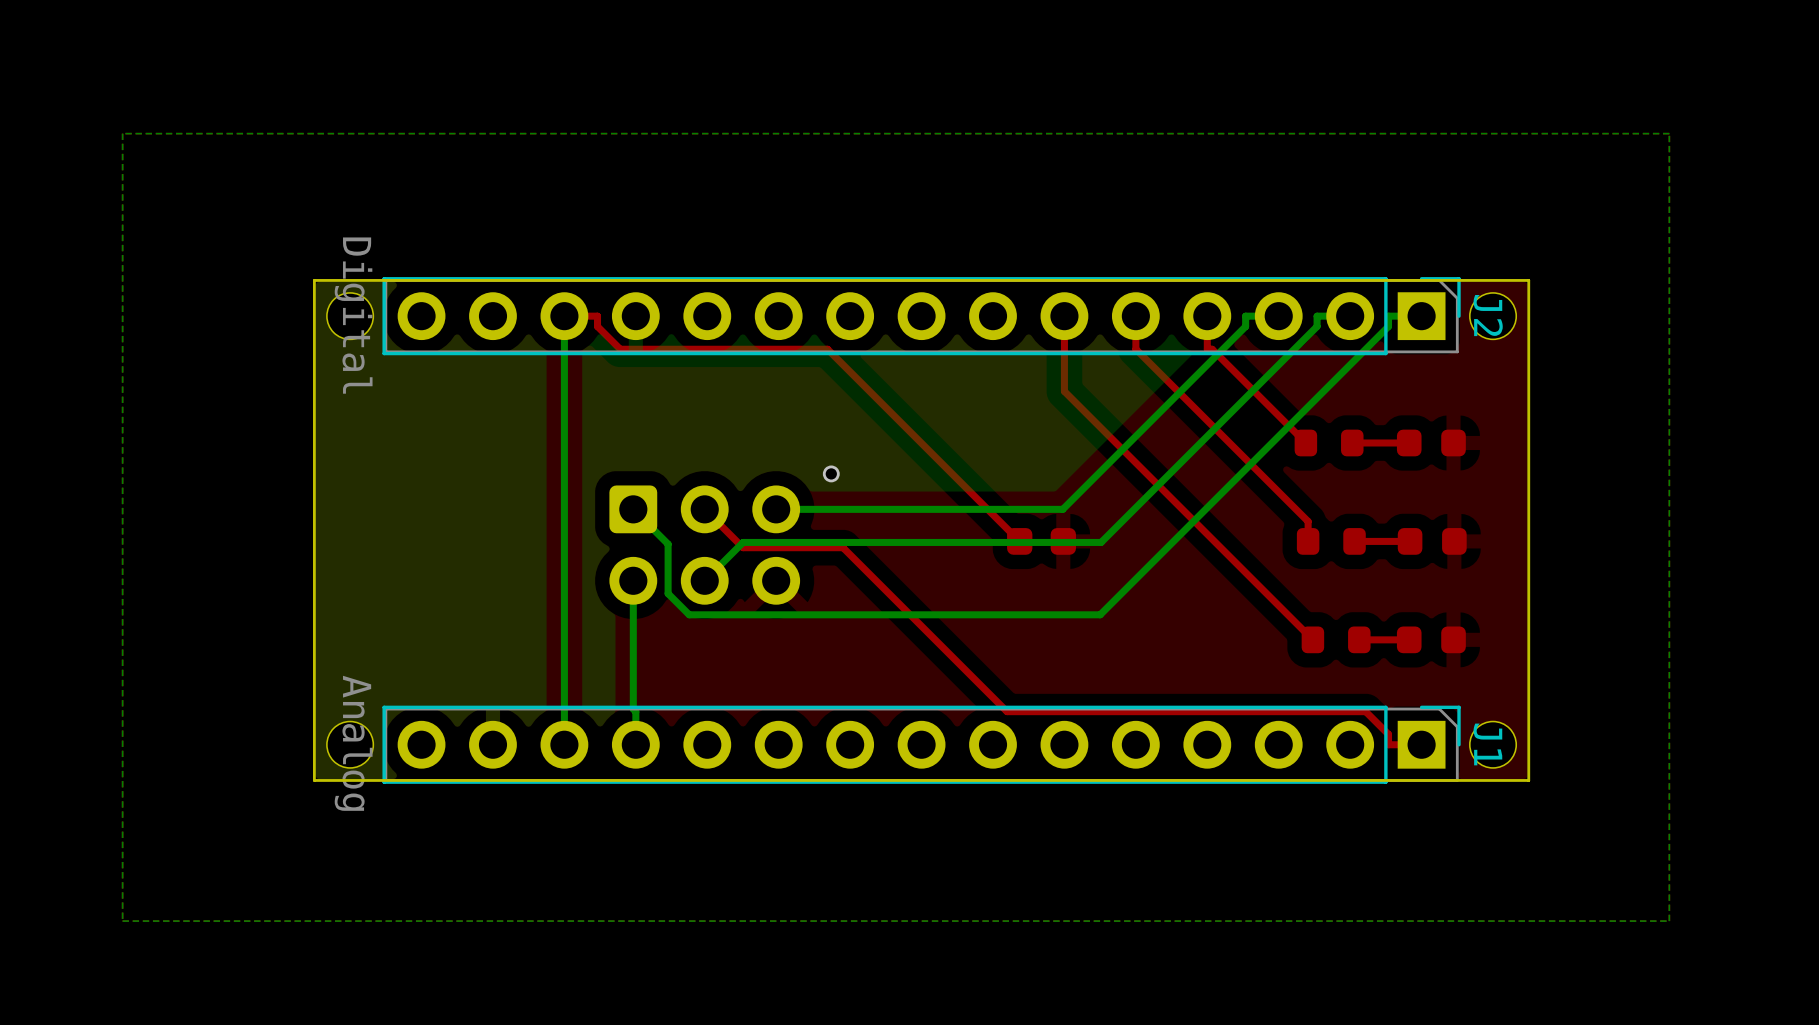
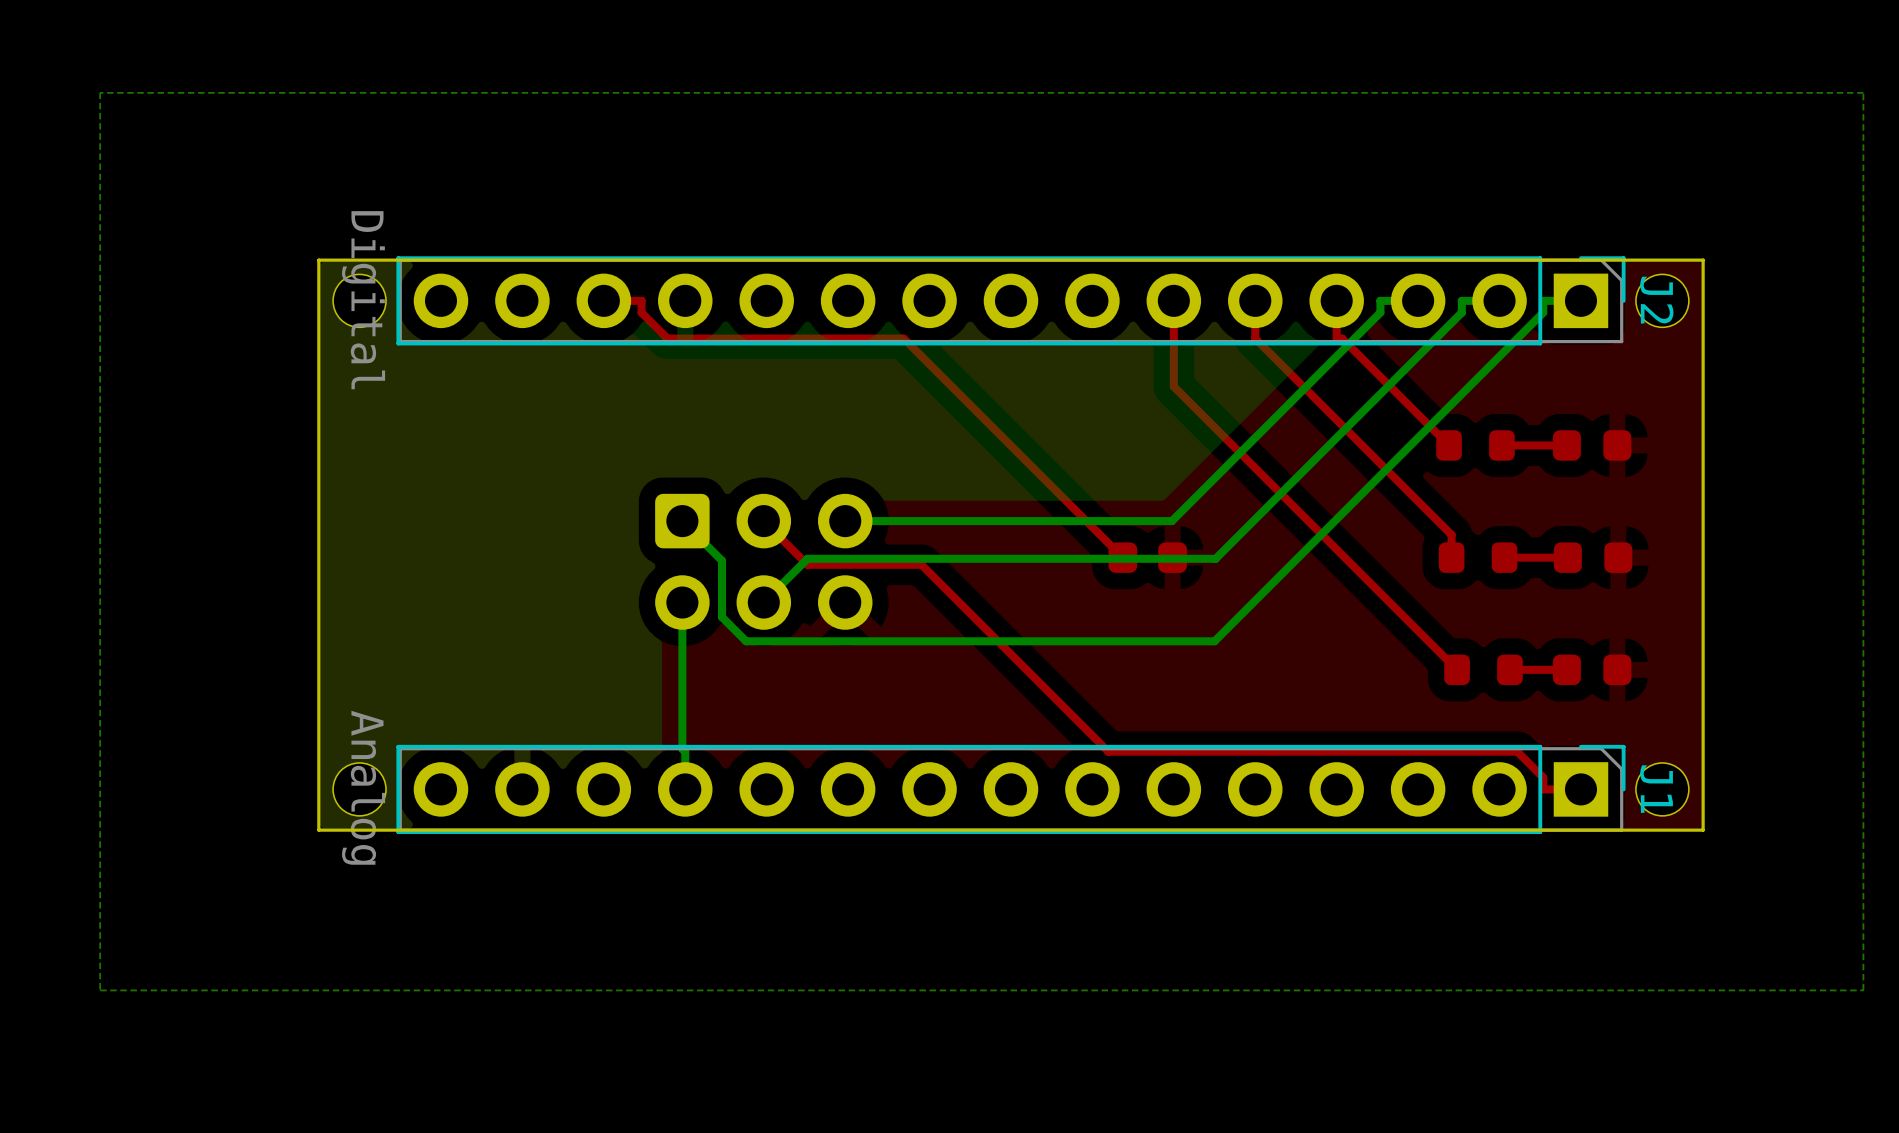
bottom track: (564, 316) (564, 744) -> none
via: (831, 473) -> none

